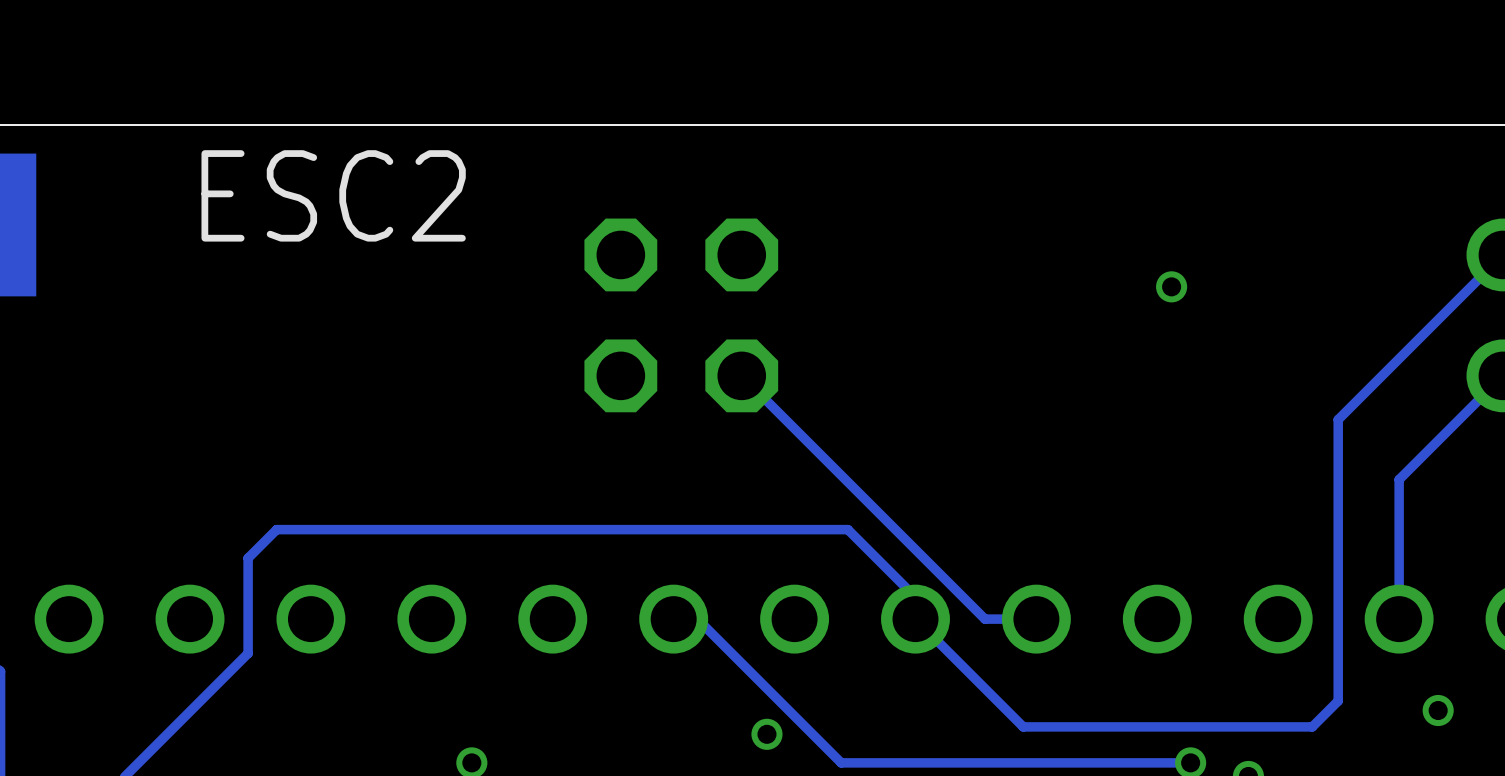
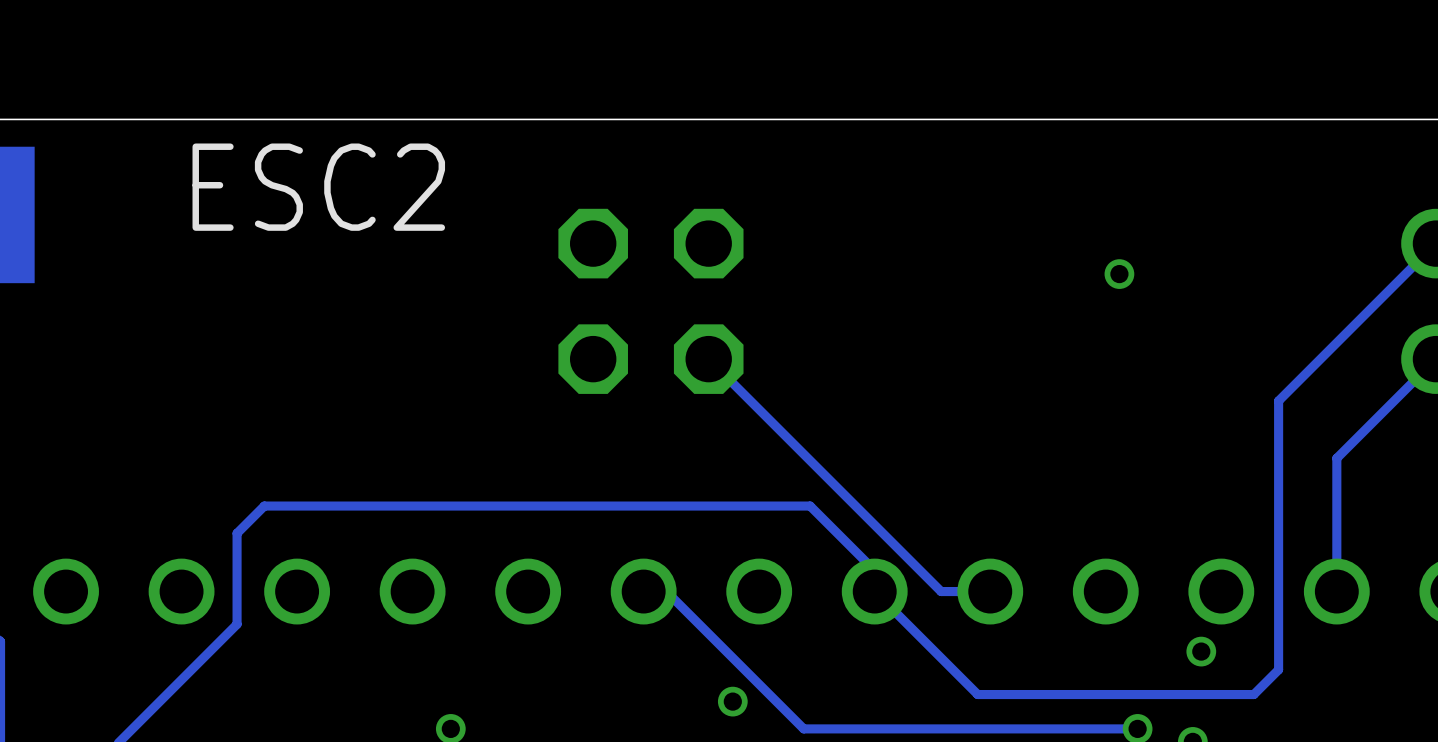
via: none -> (1201, 651)
via: (1438, 710) -> none

